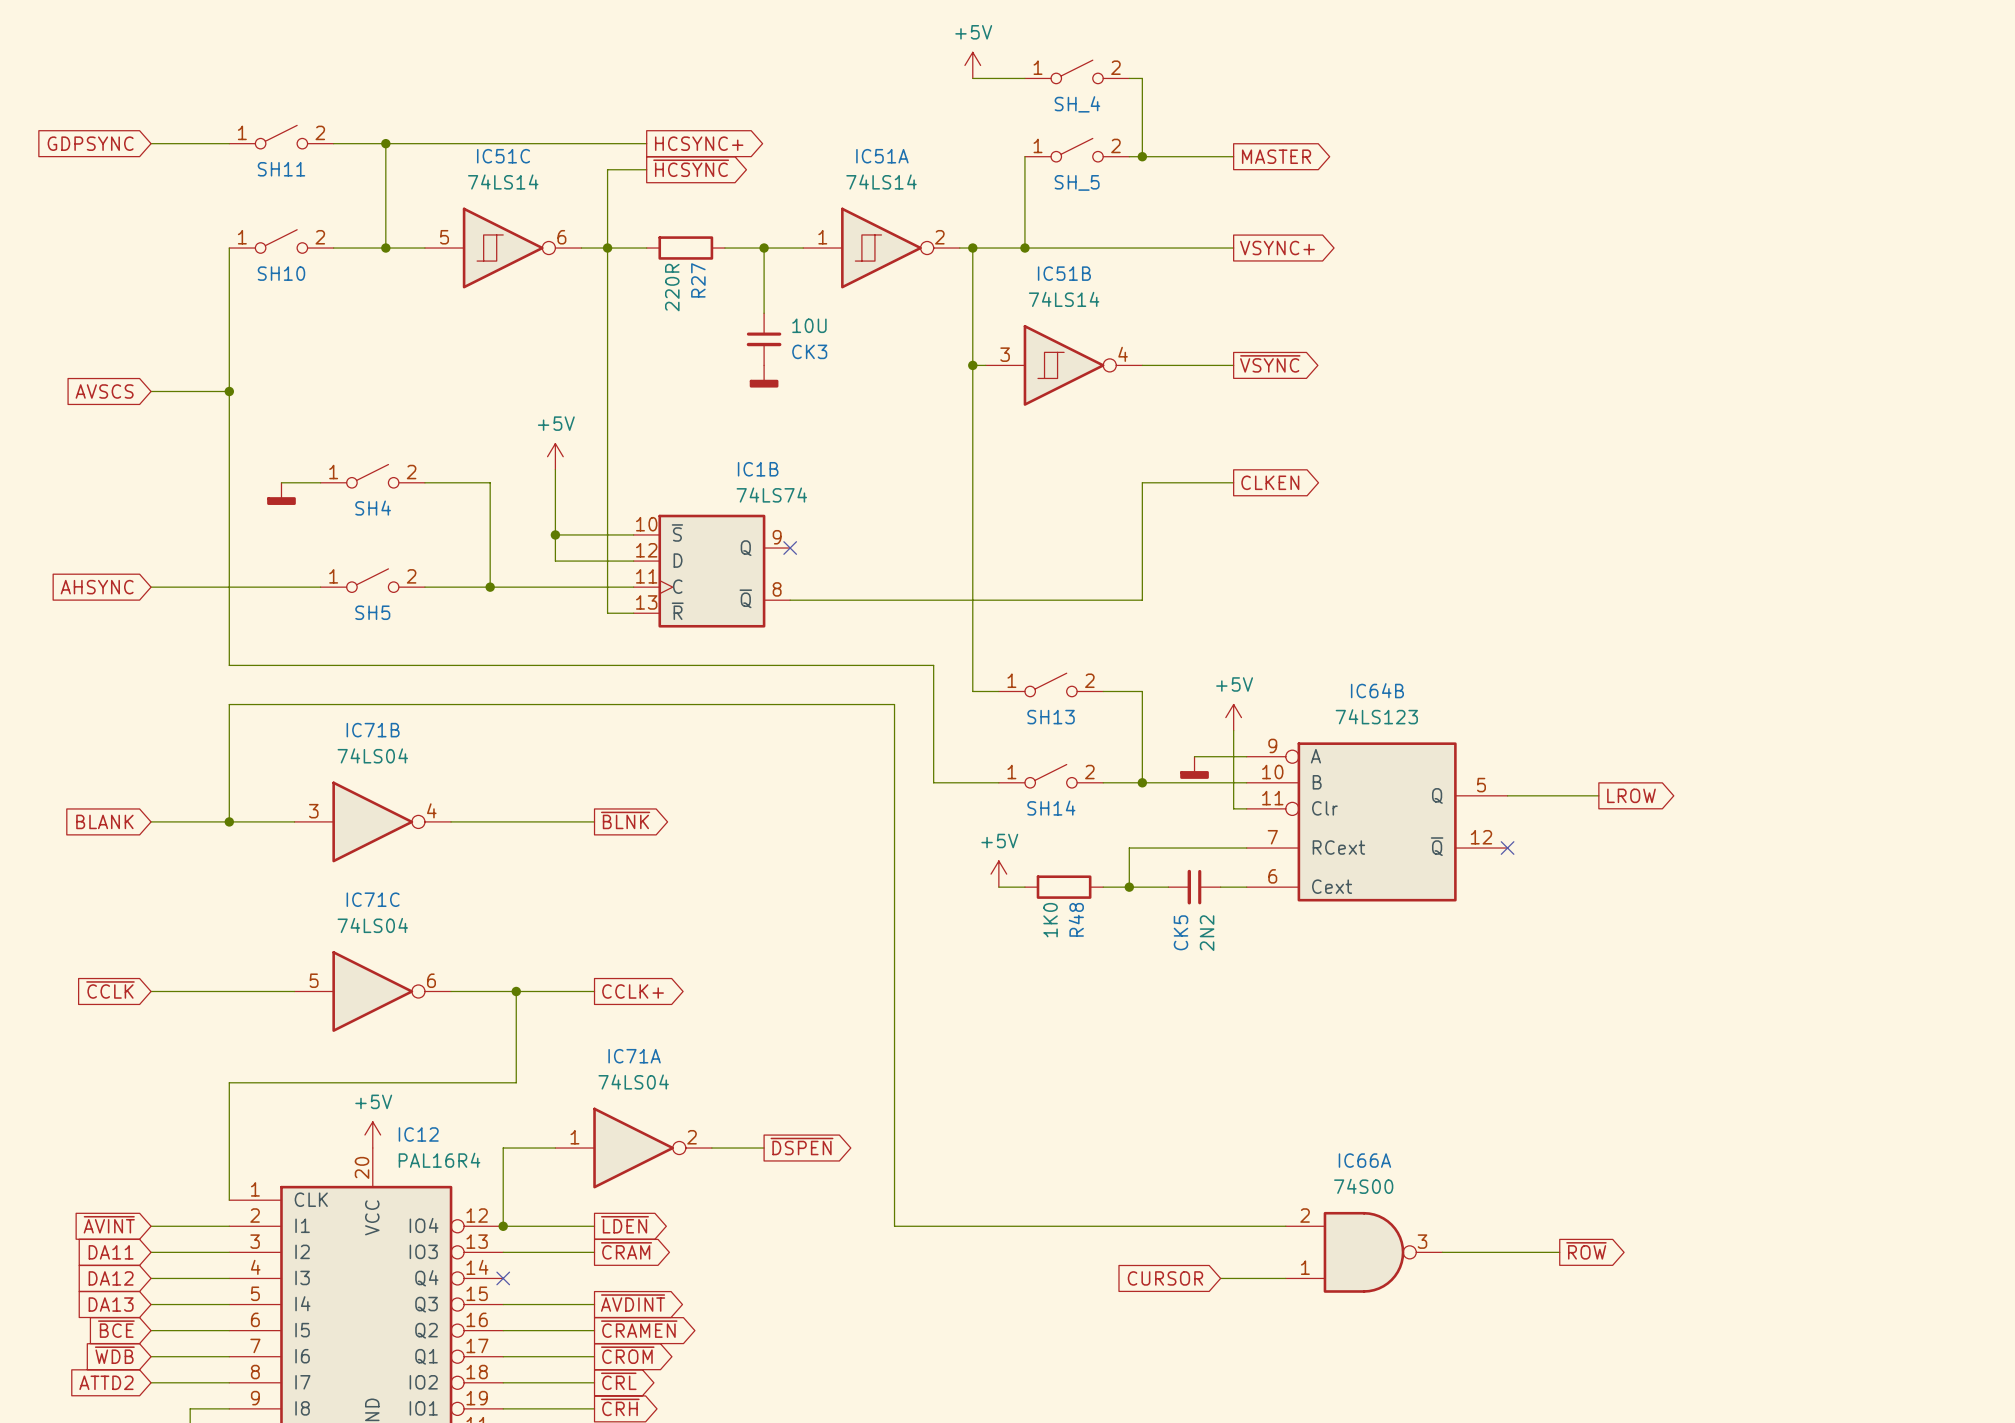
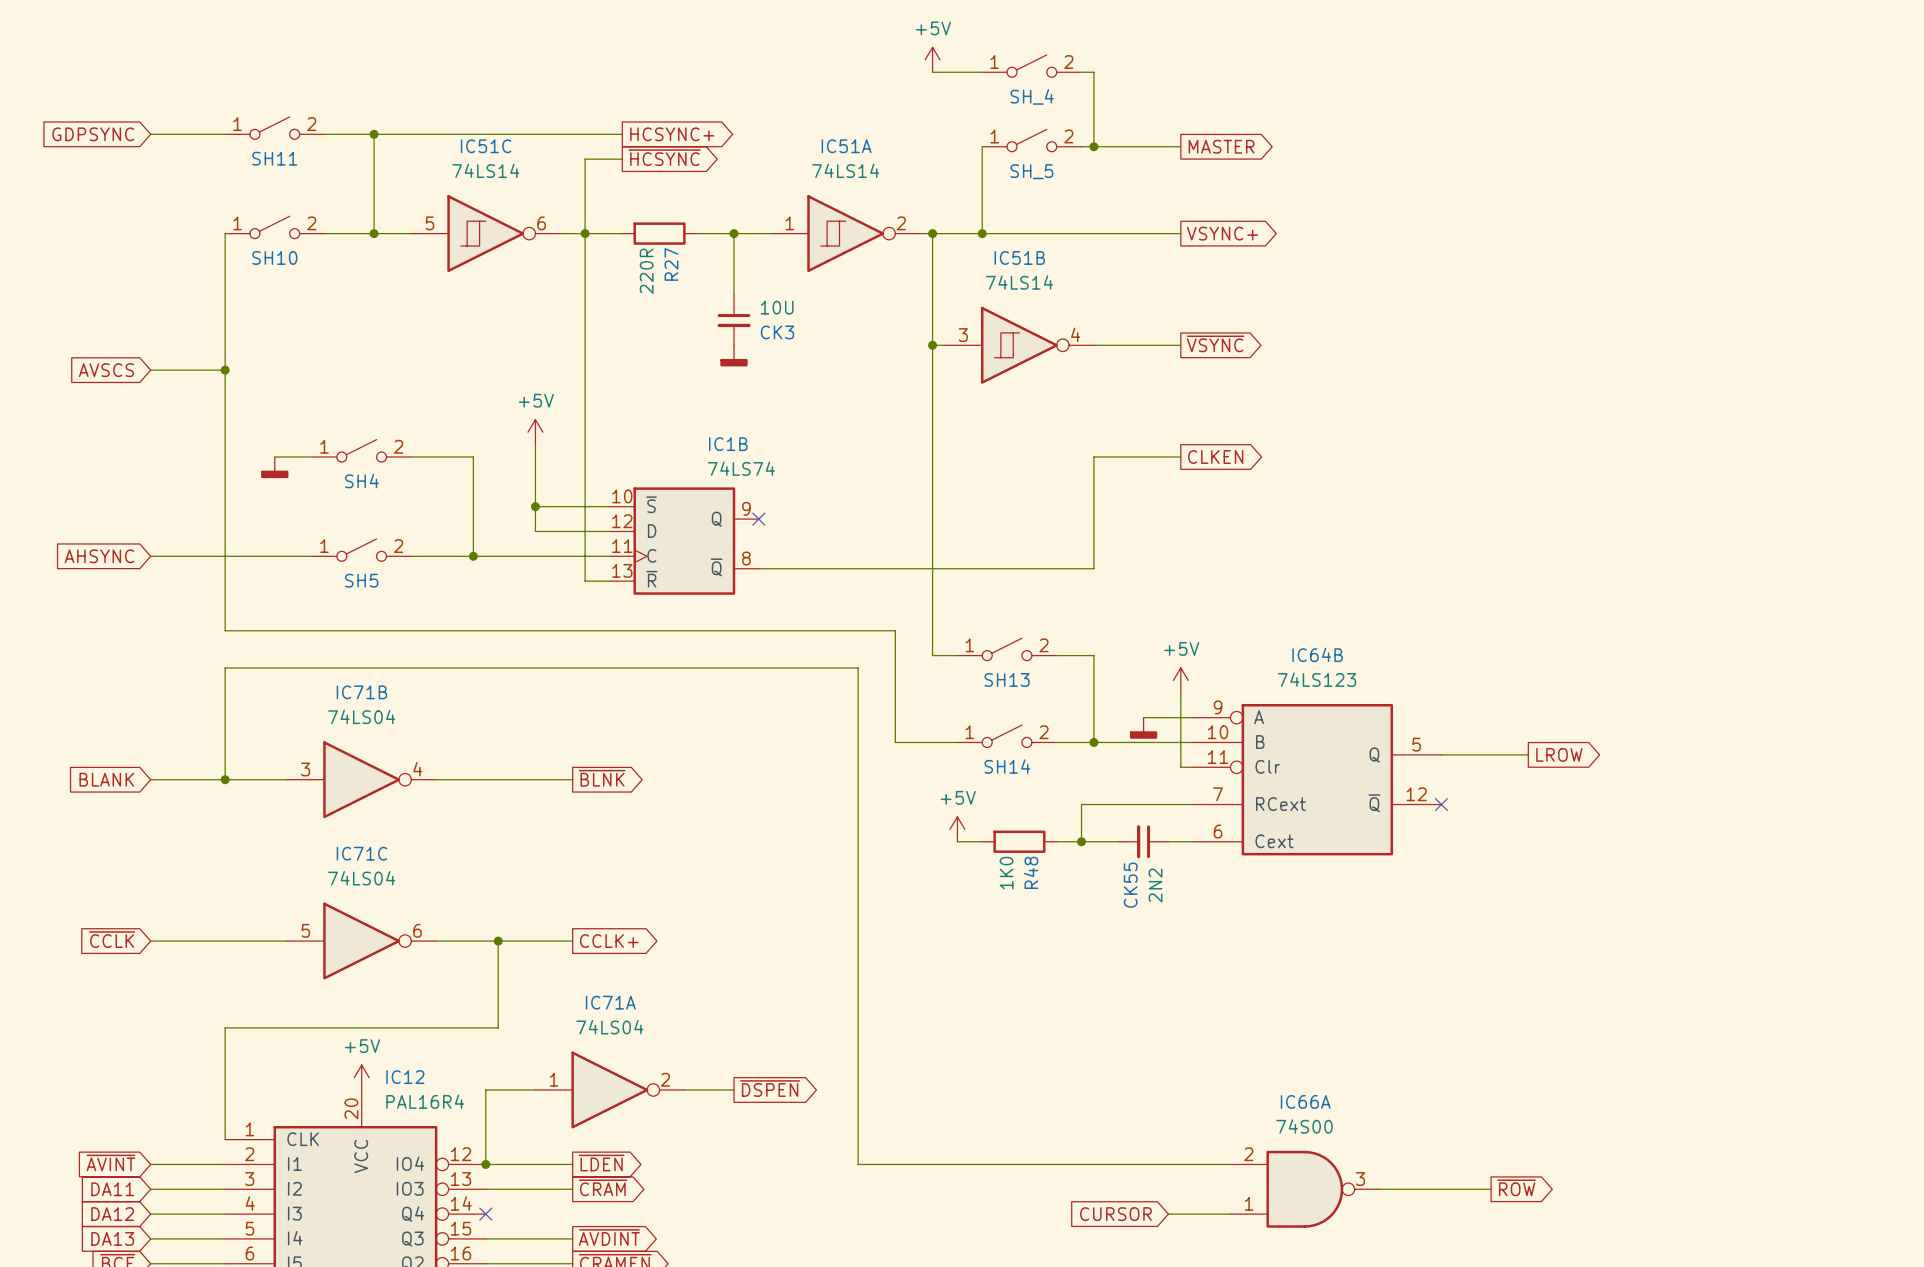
CK5 name: CK5 (1180, 932) -> CK55 (1130, 885)

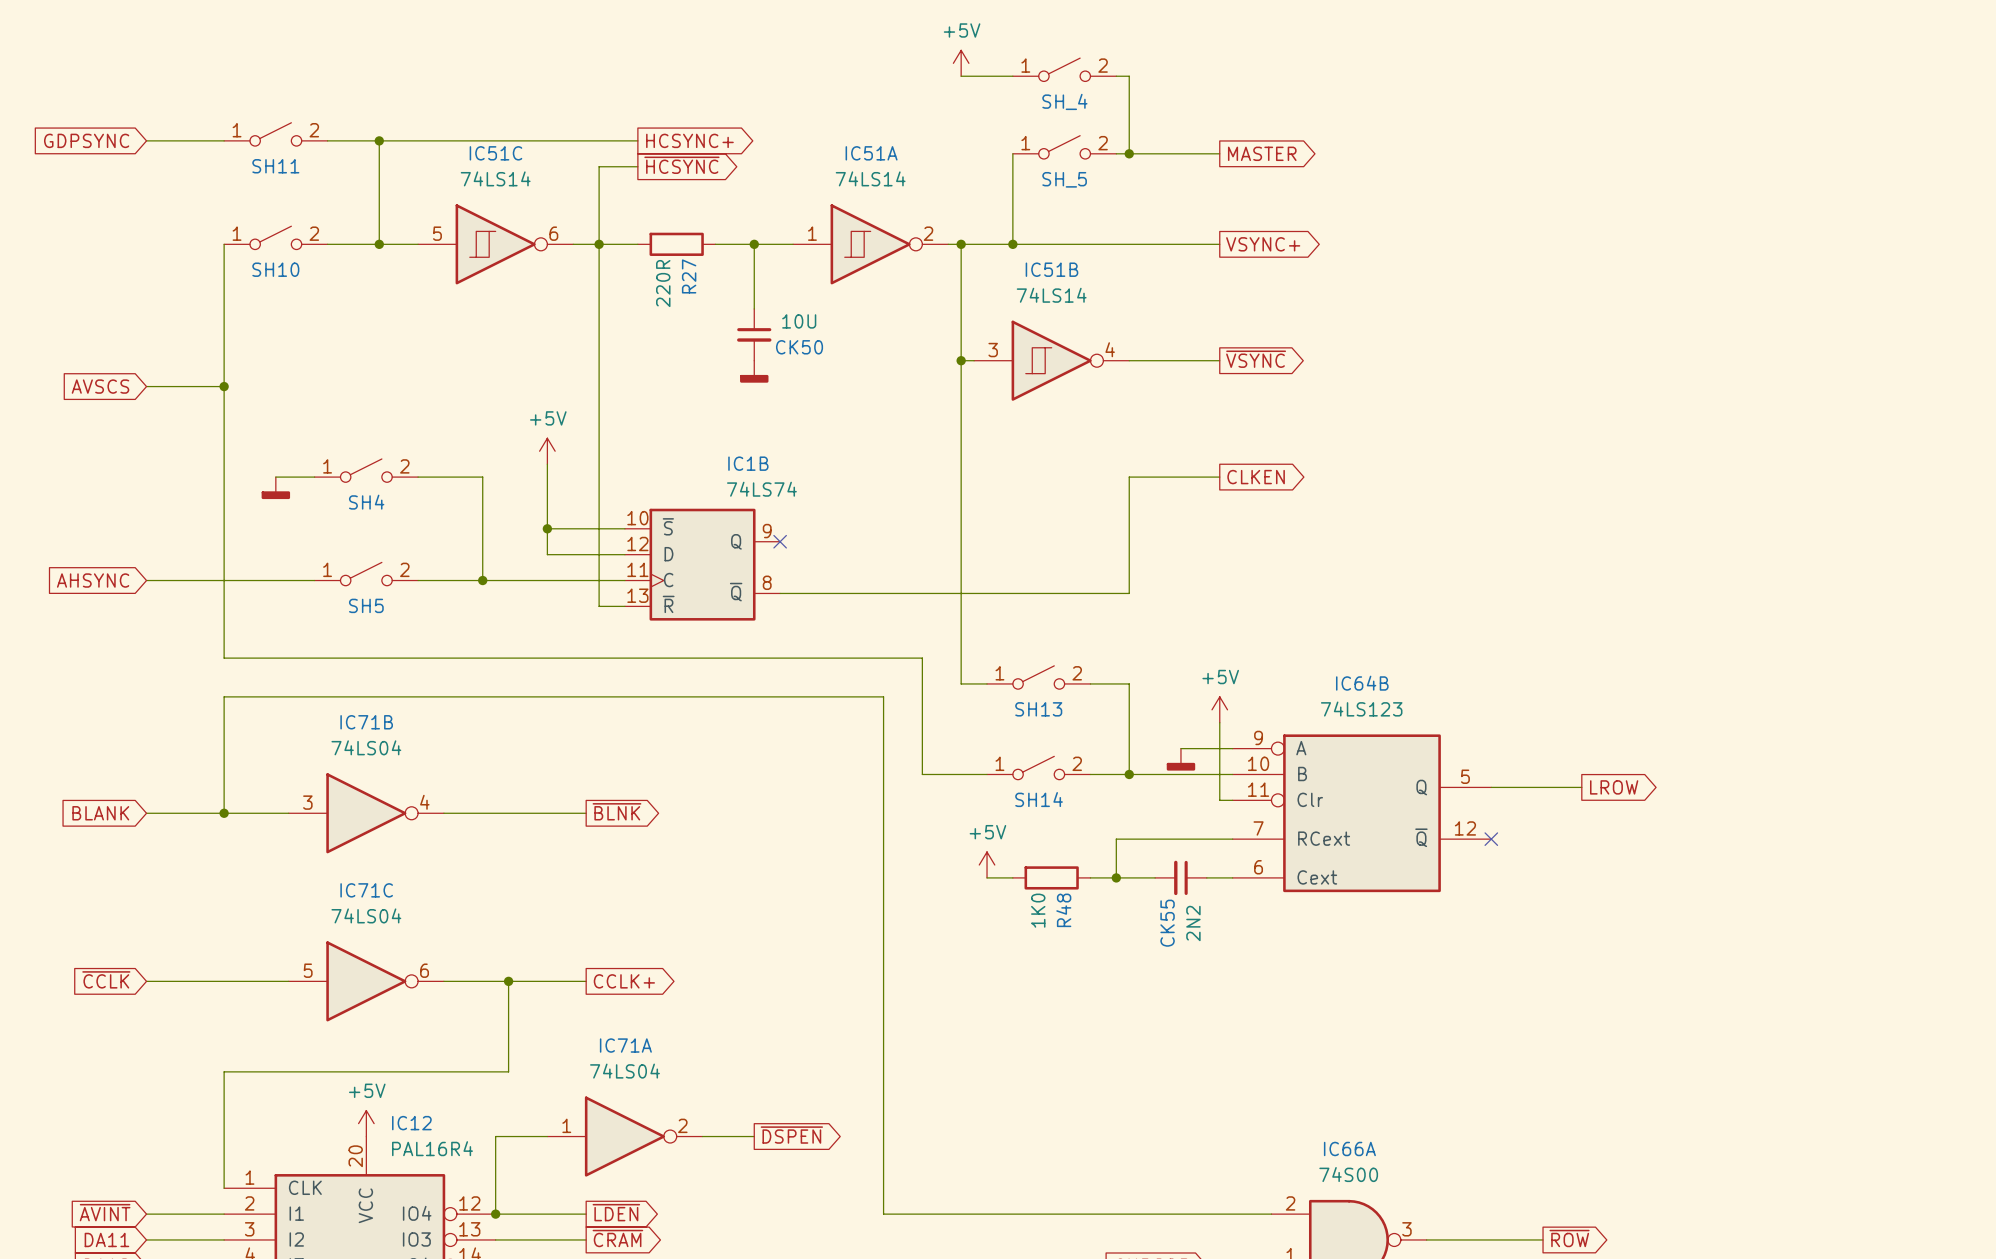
CK3 name: CK3 (777, 332) -> CK50 (799, 347)

